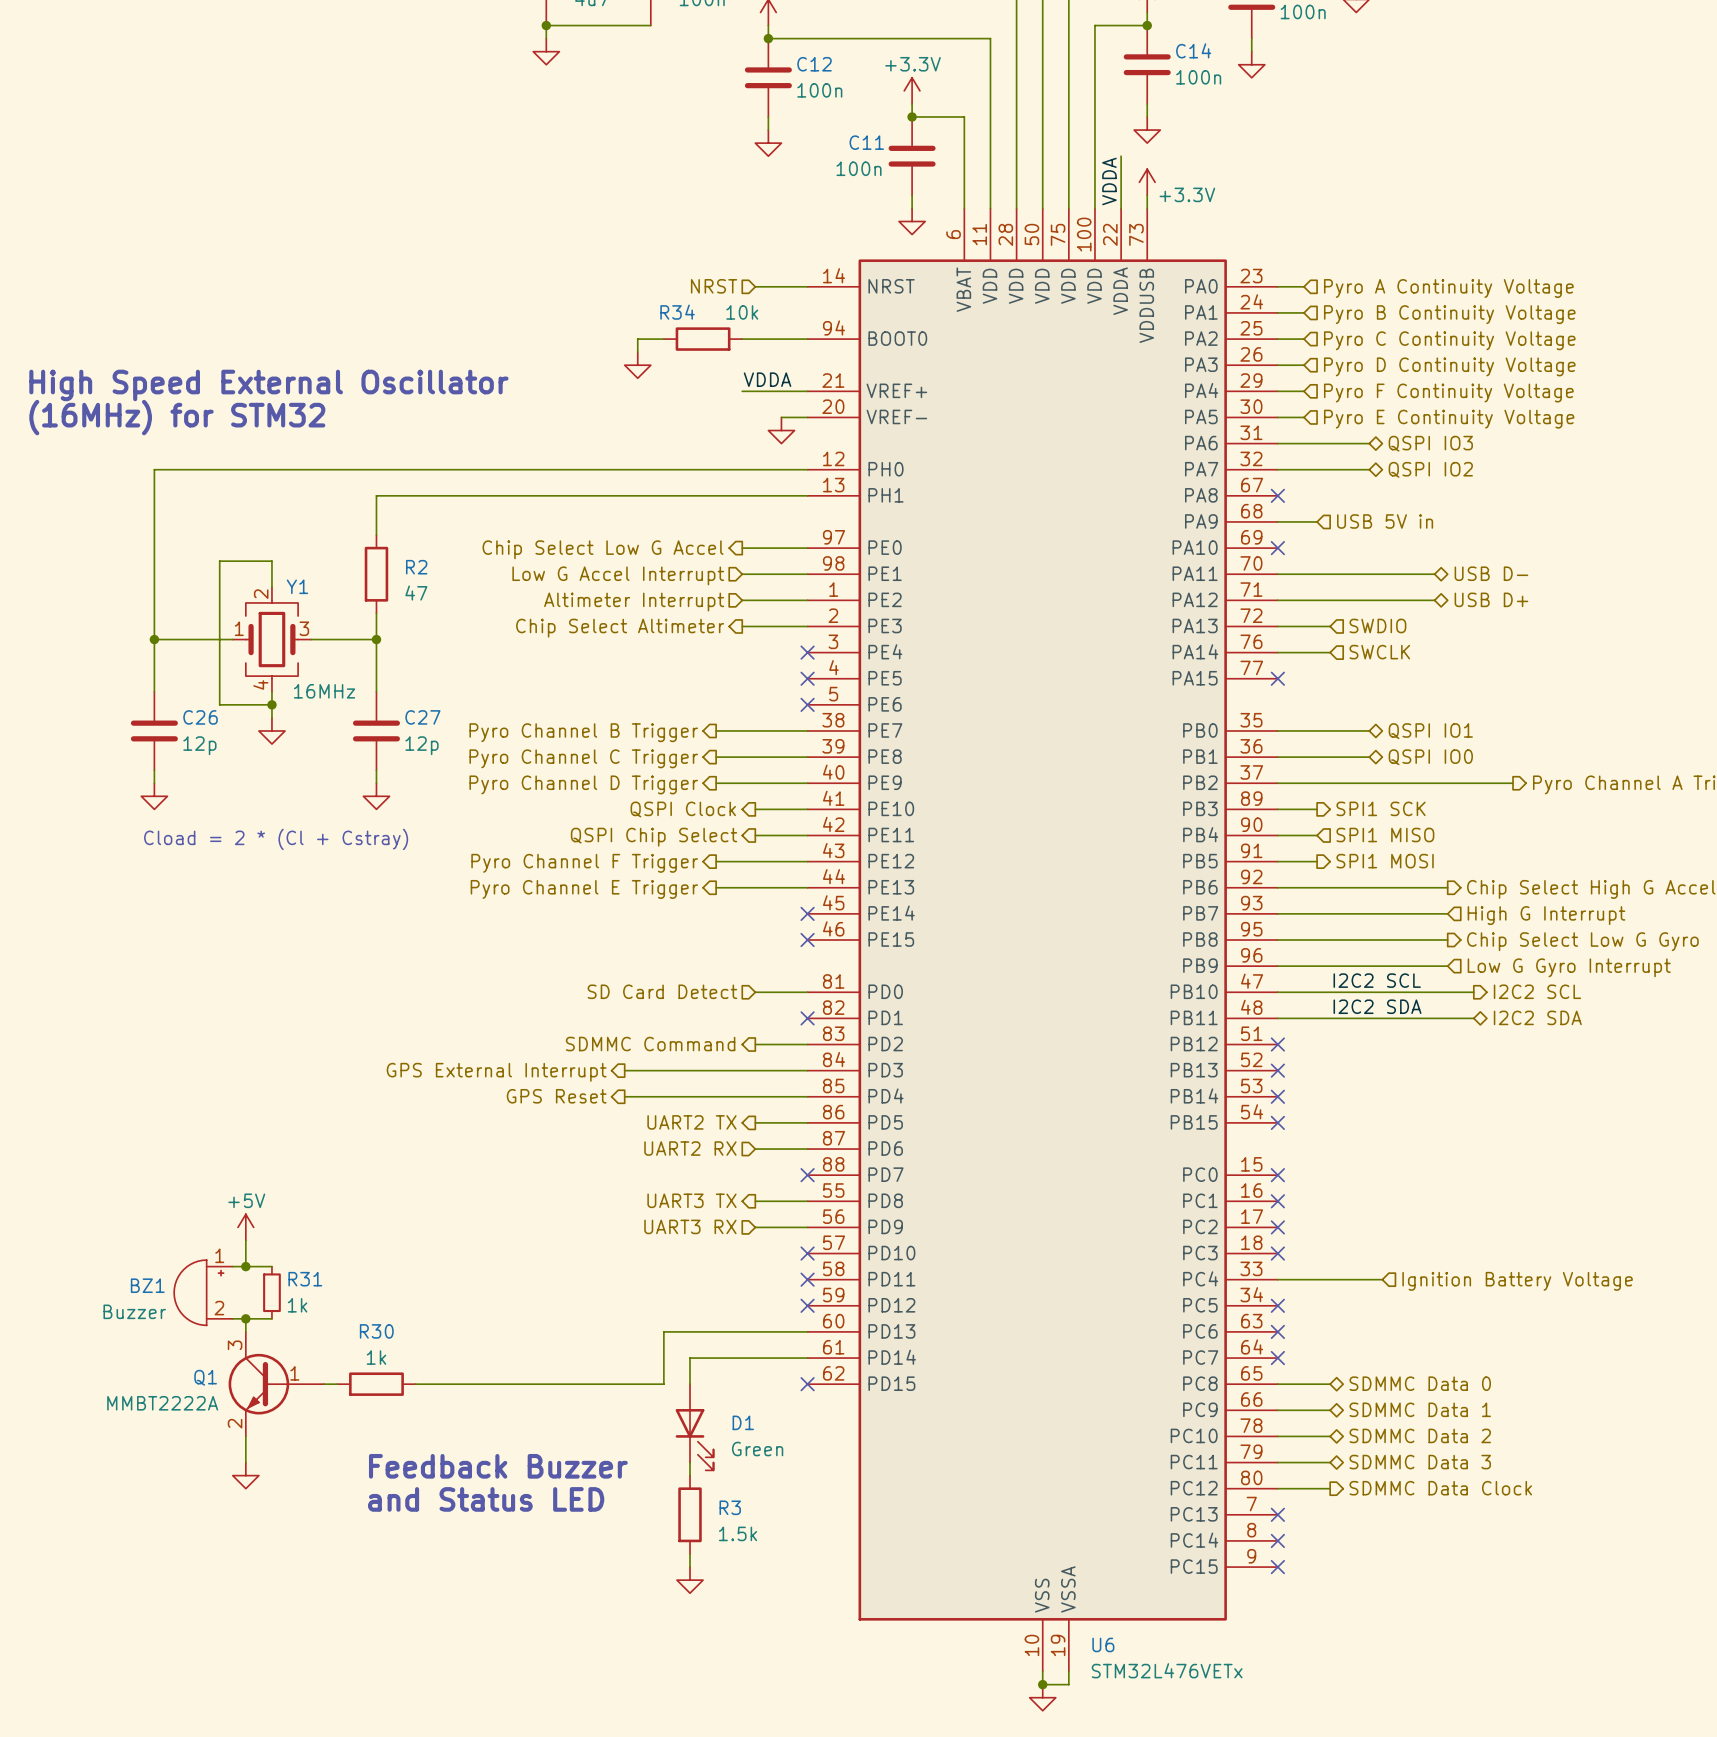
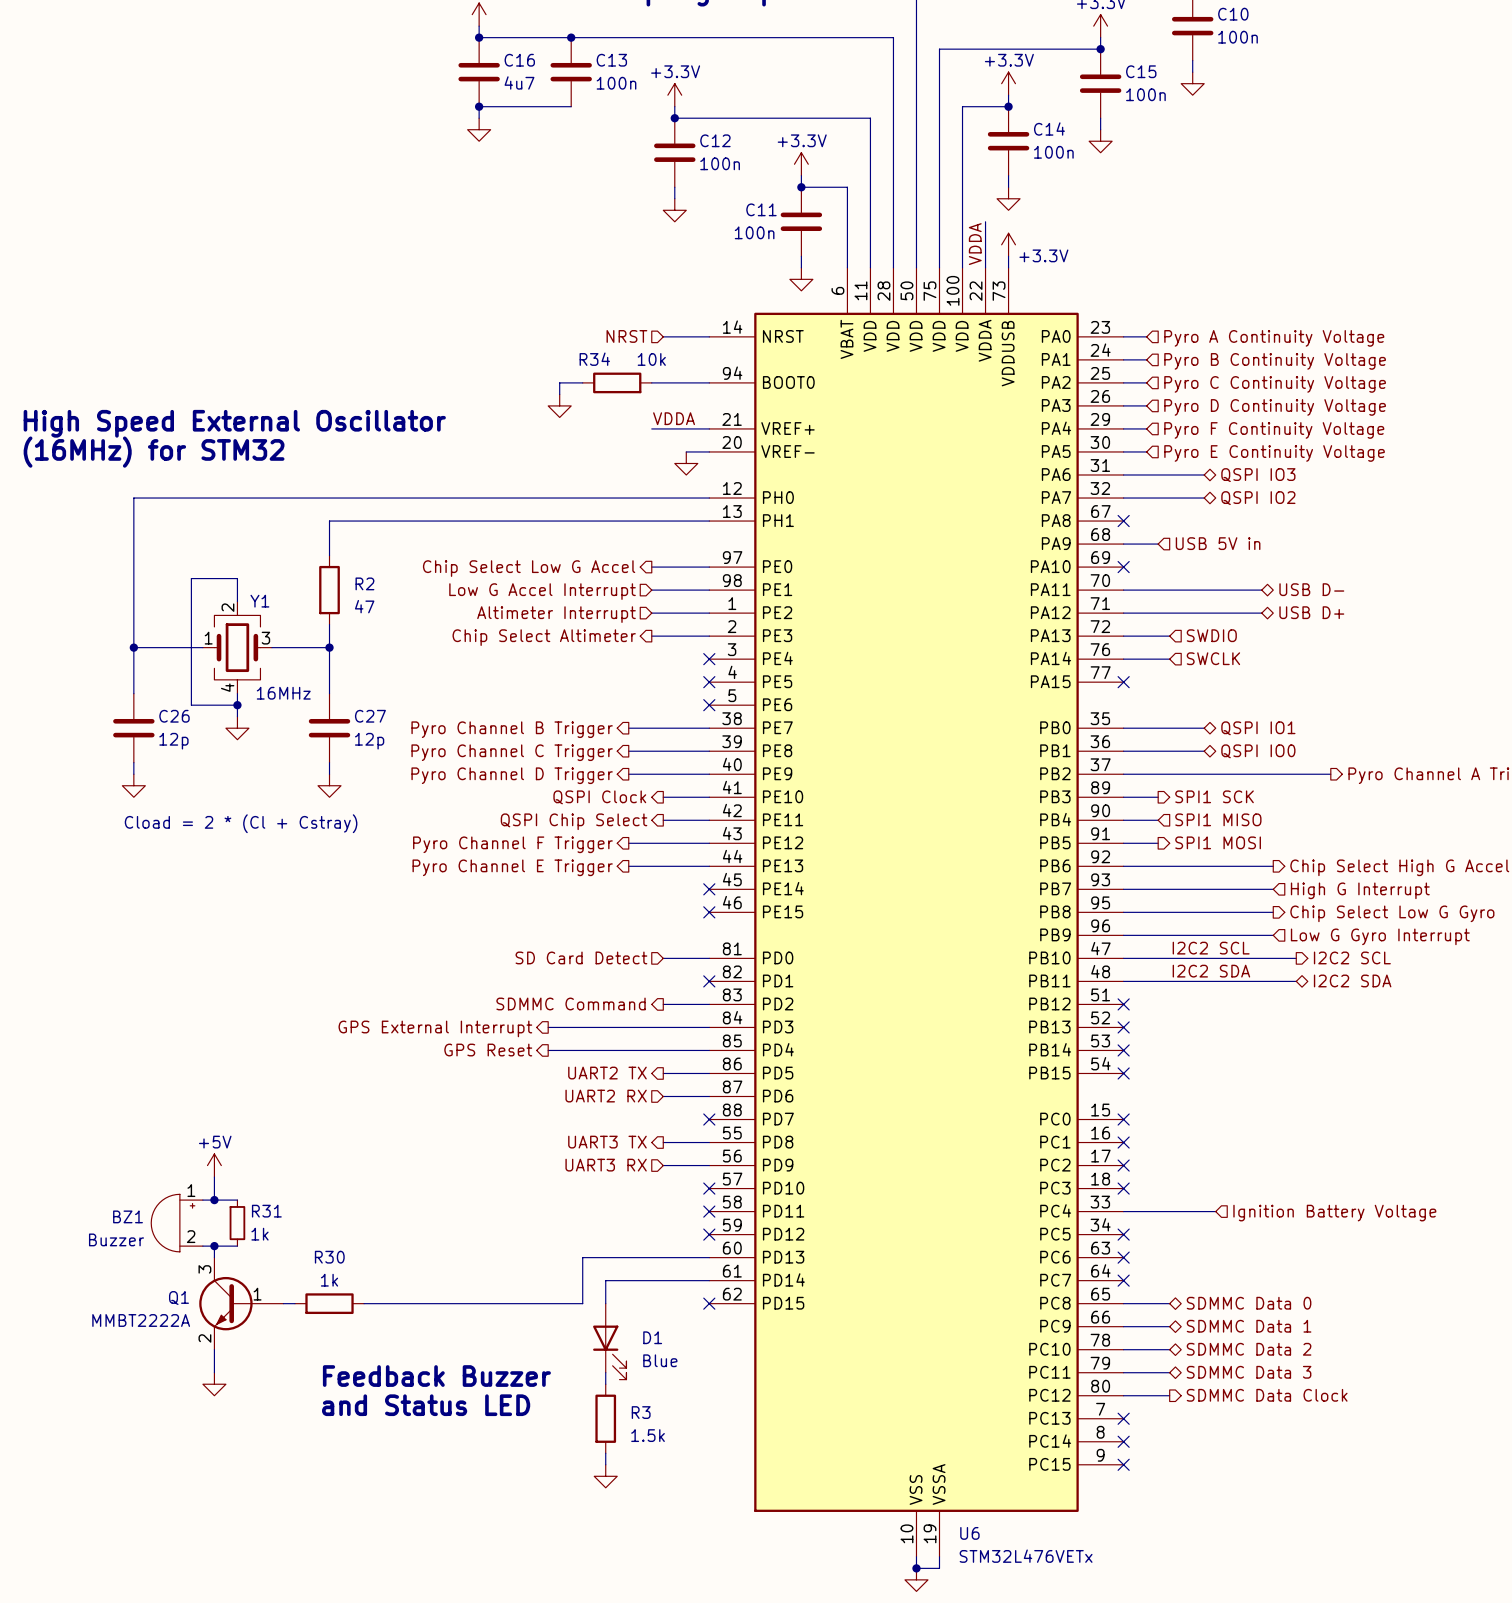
D1 value: Green (757, 1449) -> Blue (660, 1360)

